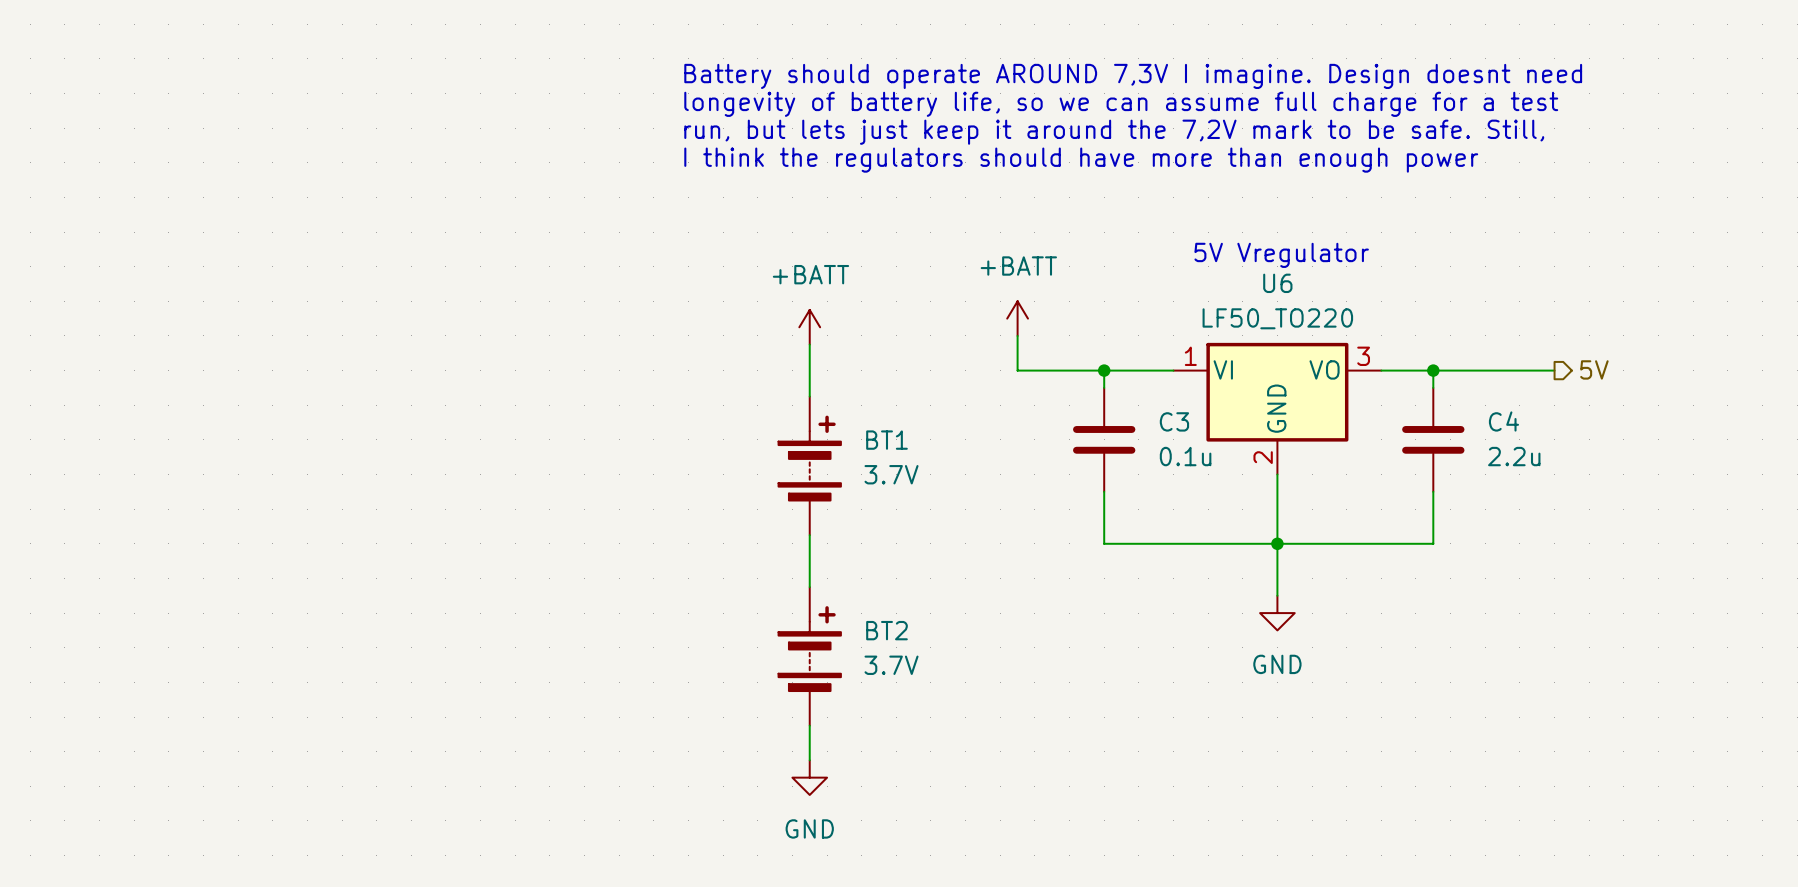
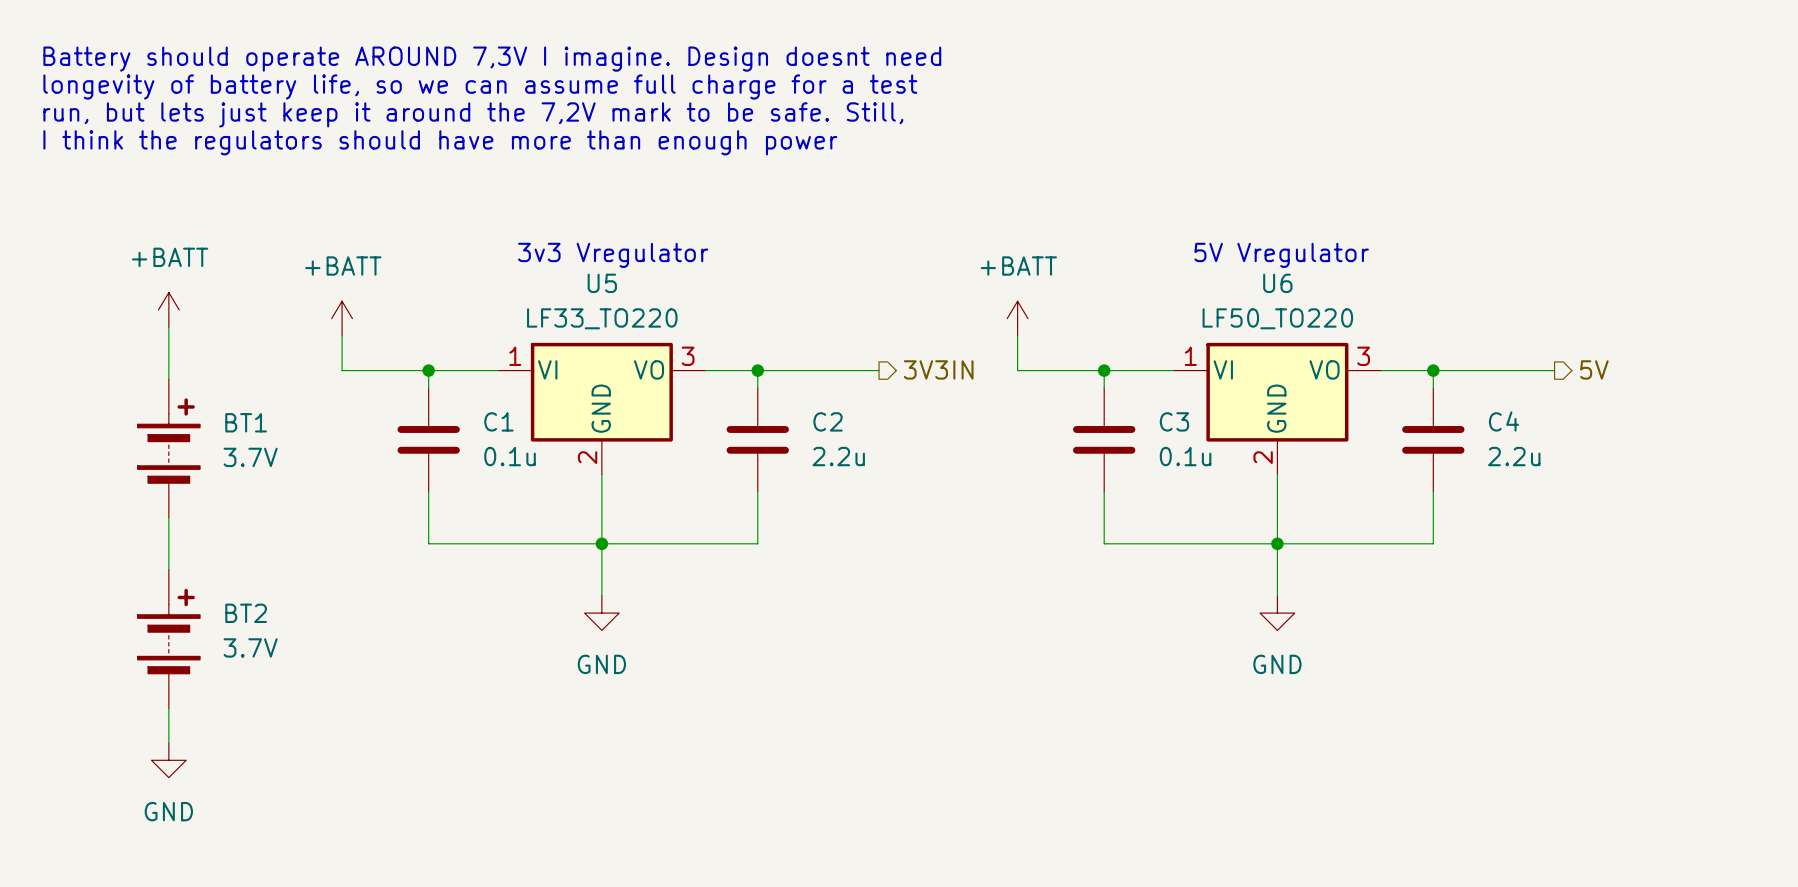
text: none -> Battery should operate AROUND 7,3V I imagine. Design doesnt need (492, 59)
text: Battery should operate AROUND 7,3V I imagine. Design doesnt need (1133, 76) -> none
text: none -> longevity of battery life, so we can assume full charge for a test (480, 86)
text: longevity of battery life, so we can assume full charge for a test (1121, 104) -> none
text: none -> run, but lets just keep it around the 7,2V mark to be safe. Still, (473, 114)
text: run, but lets just keep it around the 7,2V mark to be safe. Still, (1114, 132) -> none
text: none -> I think the regulators should have more than enough power (440, 142)
text: I think the regulators should have more than enough power (1081, 160) -> none
text: none -> 3v3 Vregulator (613, 255)
power symbol: none -> +BATT (168, 309)
power symbol: none -> +BATT (342, 318)
wire: none -> (168, 327) (168, 379)
power symbol: +BATT (809, 327) -> none
wire: none -> (342, 335) (342, 370) (497, 370)
wire: (809, 344) (809, 396) -> none
hierarchical label: none -> 3V3IN (938, 369)
wire: none -> (428, 370) (428, 387)
junction: none -> (428, 370)
wire: none -> (705, 370) (879, 370)
wire: none -> (757, 370) (757, 387)
junction: none -> (757, 370)
U5: none -> LF33_TO220 (601, 408)
C1: none -> 0.1u (428, 439)
C2: none -> 2.2u (757, 439)
BT1 position: (809, 465) -> (168, 448)
wire: none -> (601, 474) (601, 595)
wire: none -> (428, 491) (428, 543) (757, 543) (757, 491)
wire: none -> (168, 517) (168, 569)
wire: (809, 535) (809, 587) -> none
junction: none -> (601, 543)
BT2 position: (809, 656) -> (168, 639)
wire: none -> (168, 708) (168, 742)
wire: (809, 725) (809, 760) -> none
power symbol: none -> GND (168, 760)
power symbol position: GND (809, 777) -> GND (601, 613)

